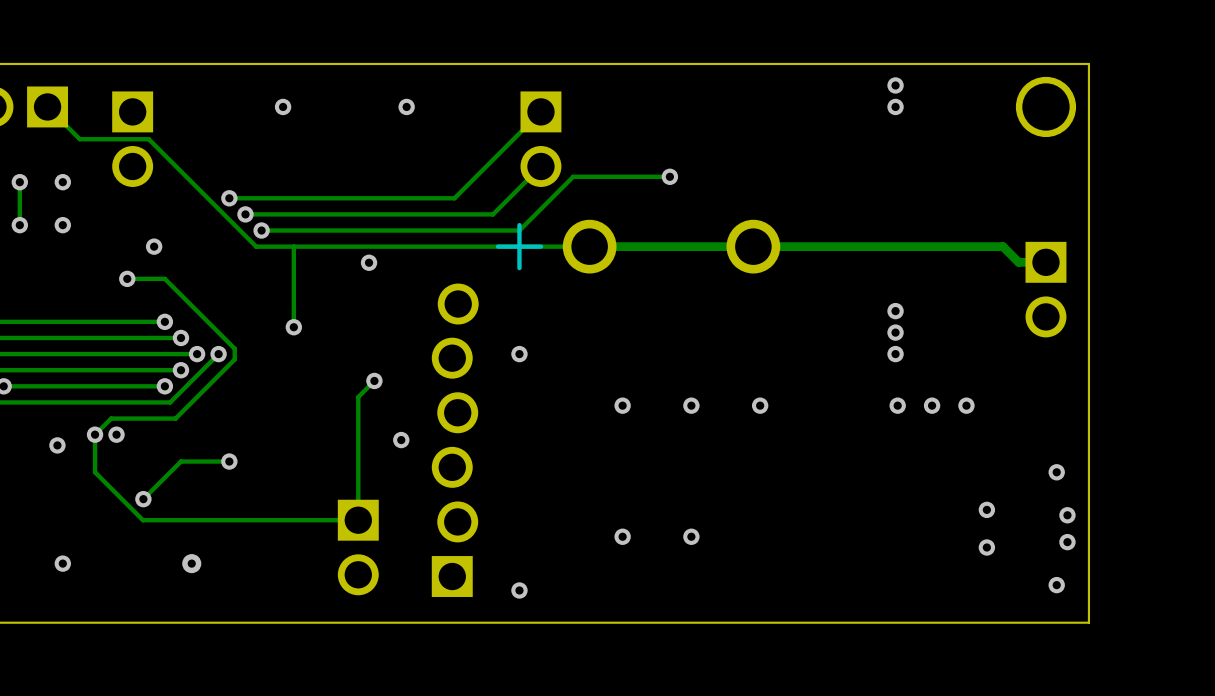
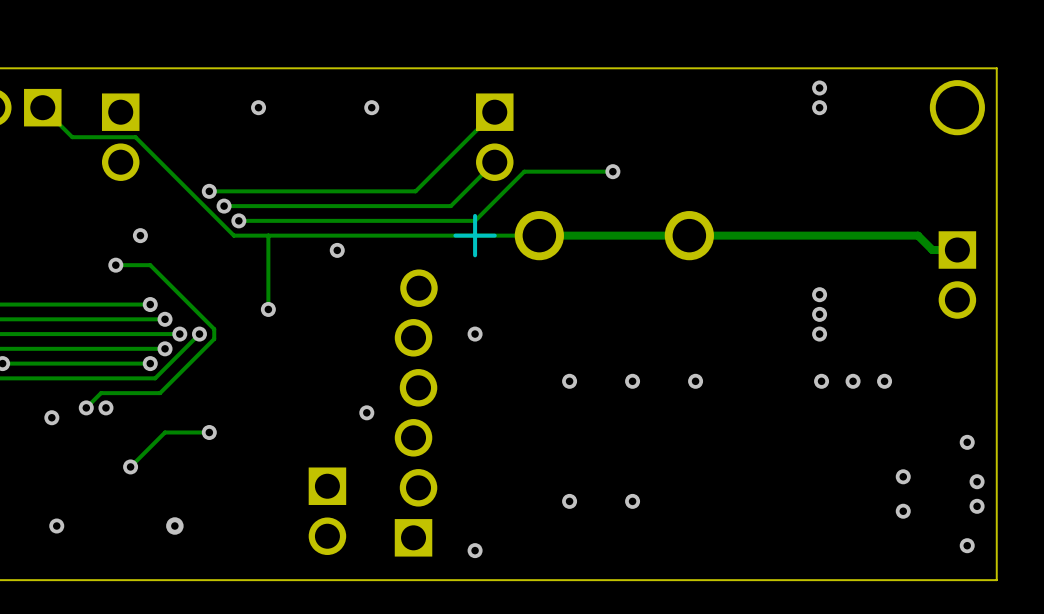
track: (19, 182) (19, 225) -> none
via: (19, 182) -> none
via: (62, 182) -> none
via: (19, 225) -> none
via: (62, 225) -> none
track: (374, 380) (358, 397) (358, 520) (142, 520) (95, 472) (95, 434) -> none
via: (374, 380) -> none

